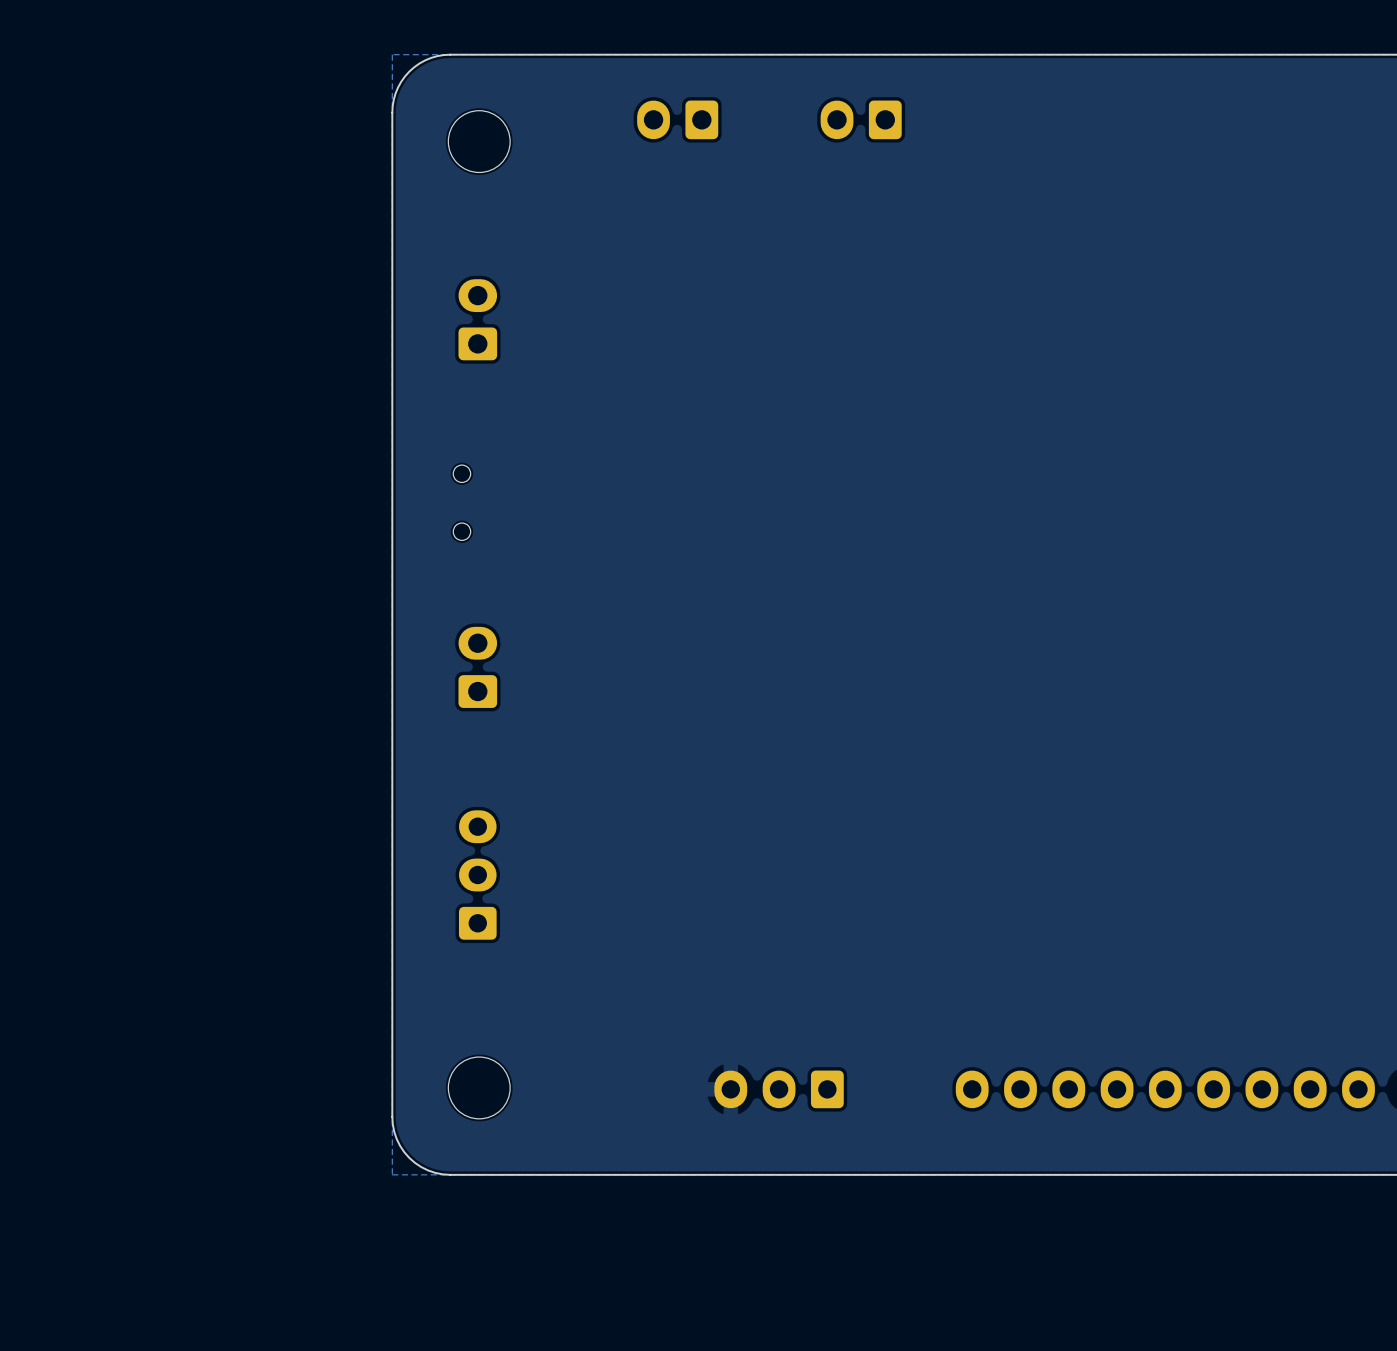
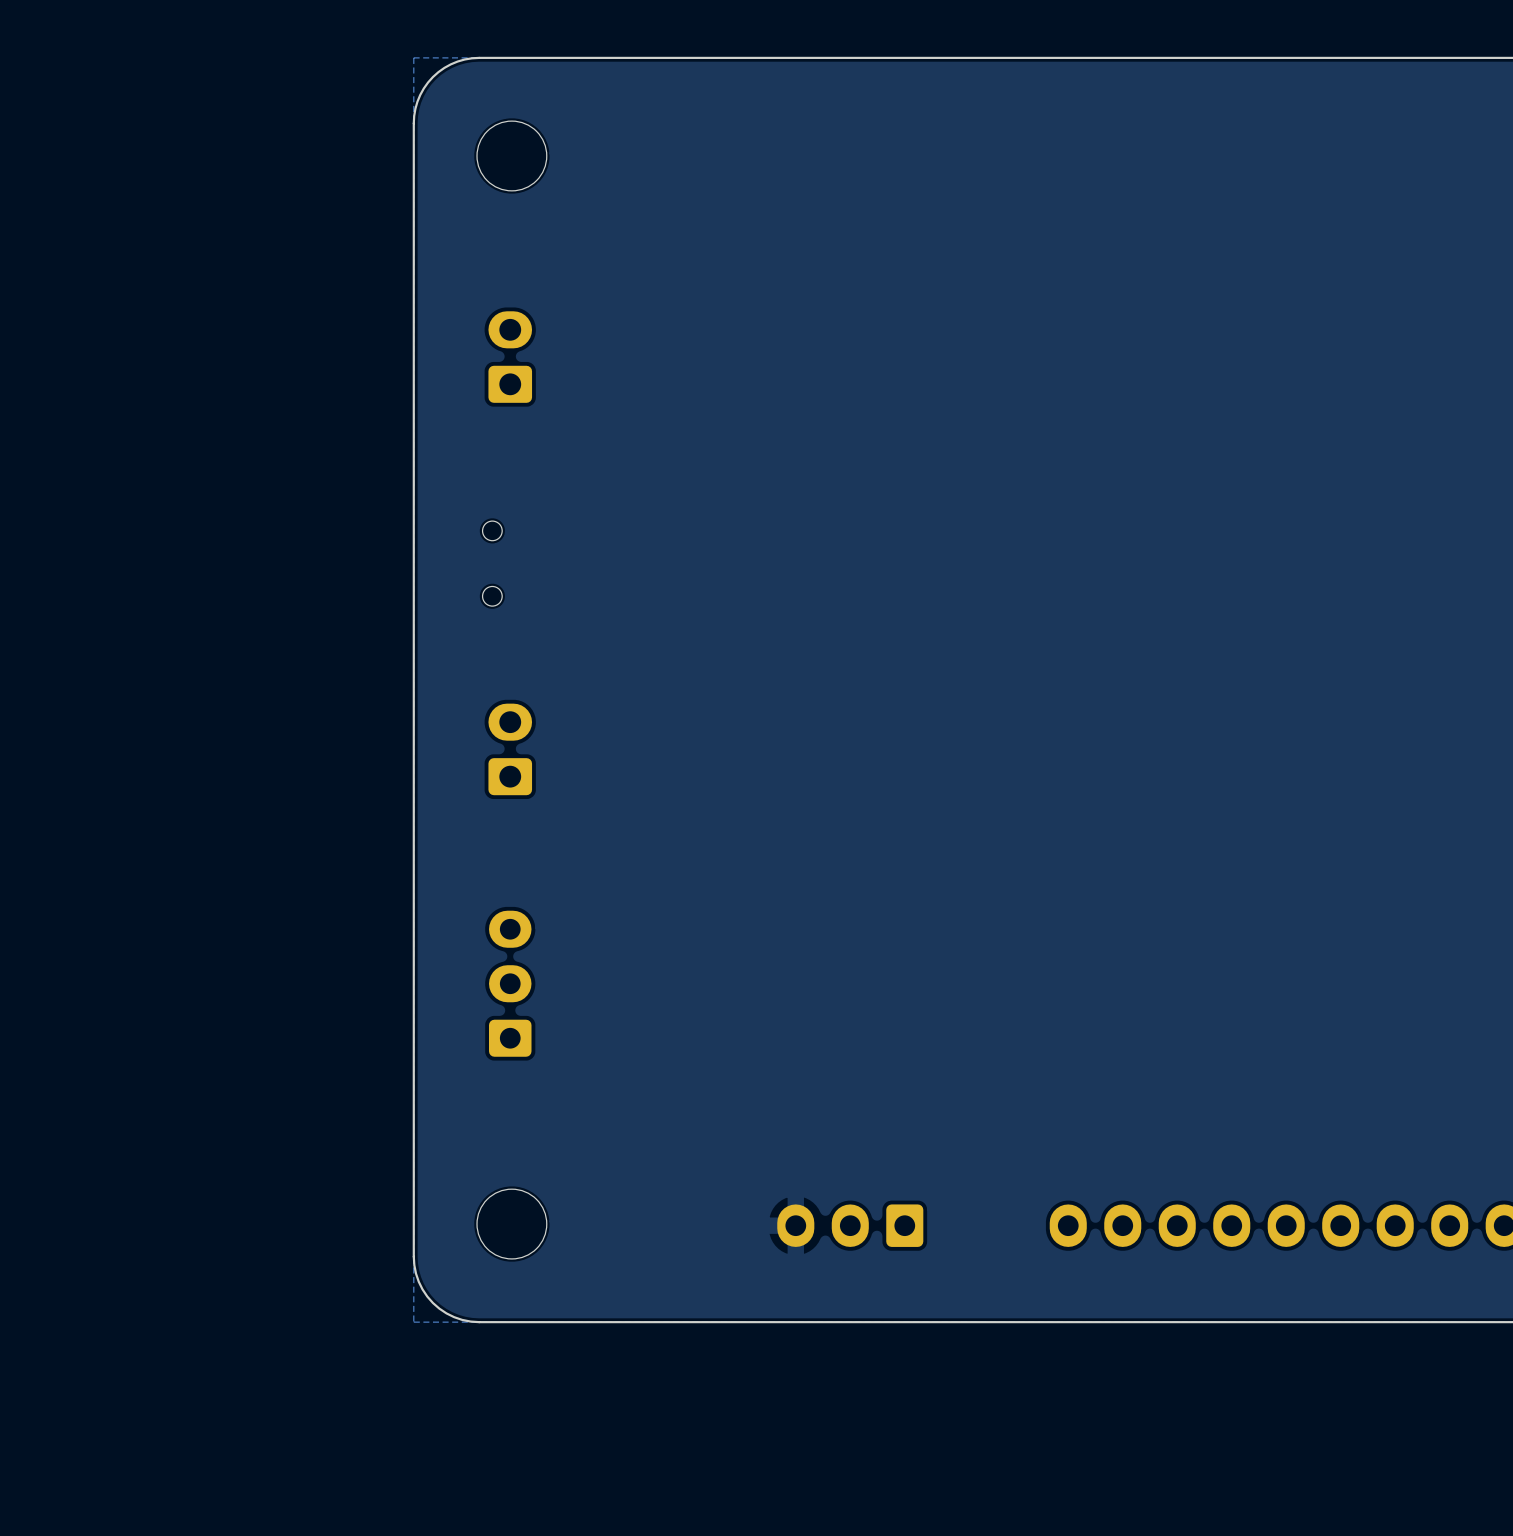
part: (677, 119) -> none
part: (861, 119) -> none

